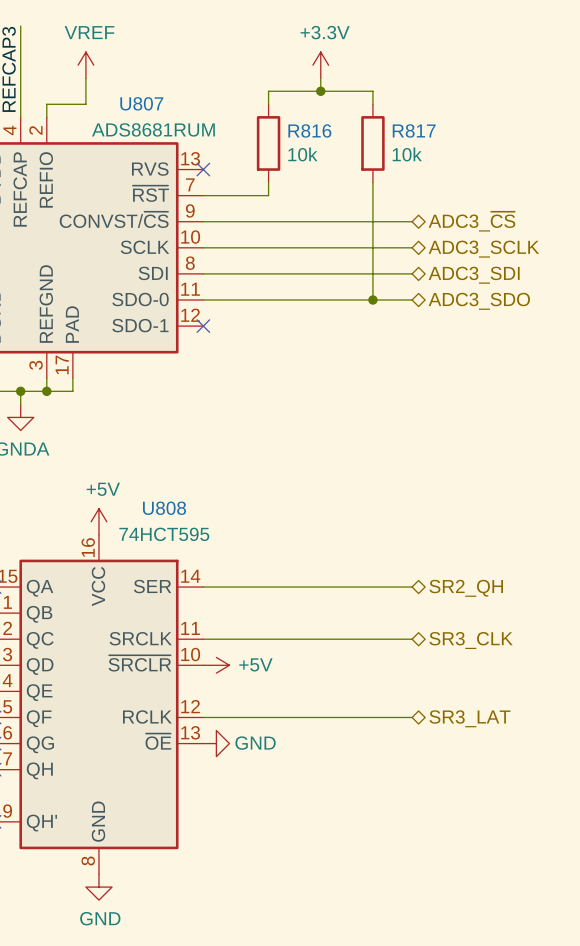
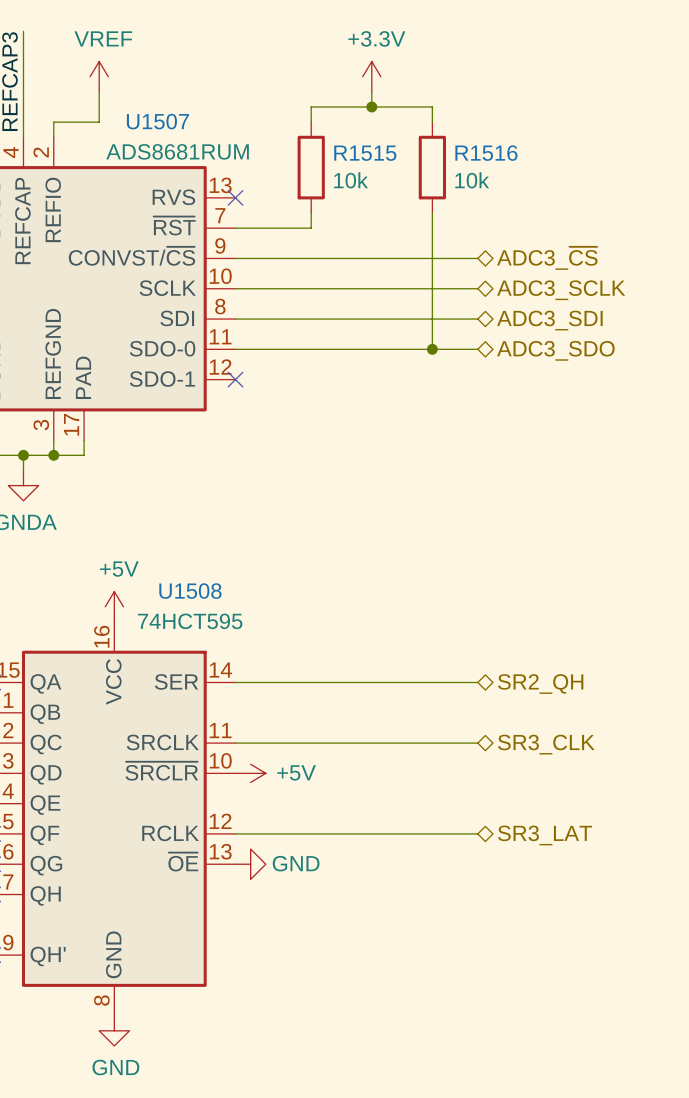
U807 name: U807 (141, 103) -> U1507 (157, 121)
R816 name: R816 (309, 130) -> R1515 (365, 153)
R817 name: R817 (414, 130) -> R1516 (486, 153)
U808 name: U808 (164, 508) -> U1508 (190, 591)

